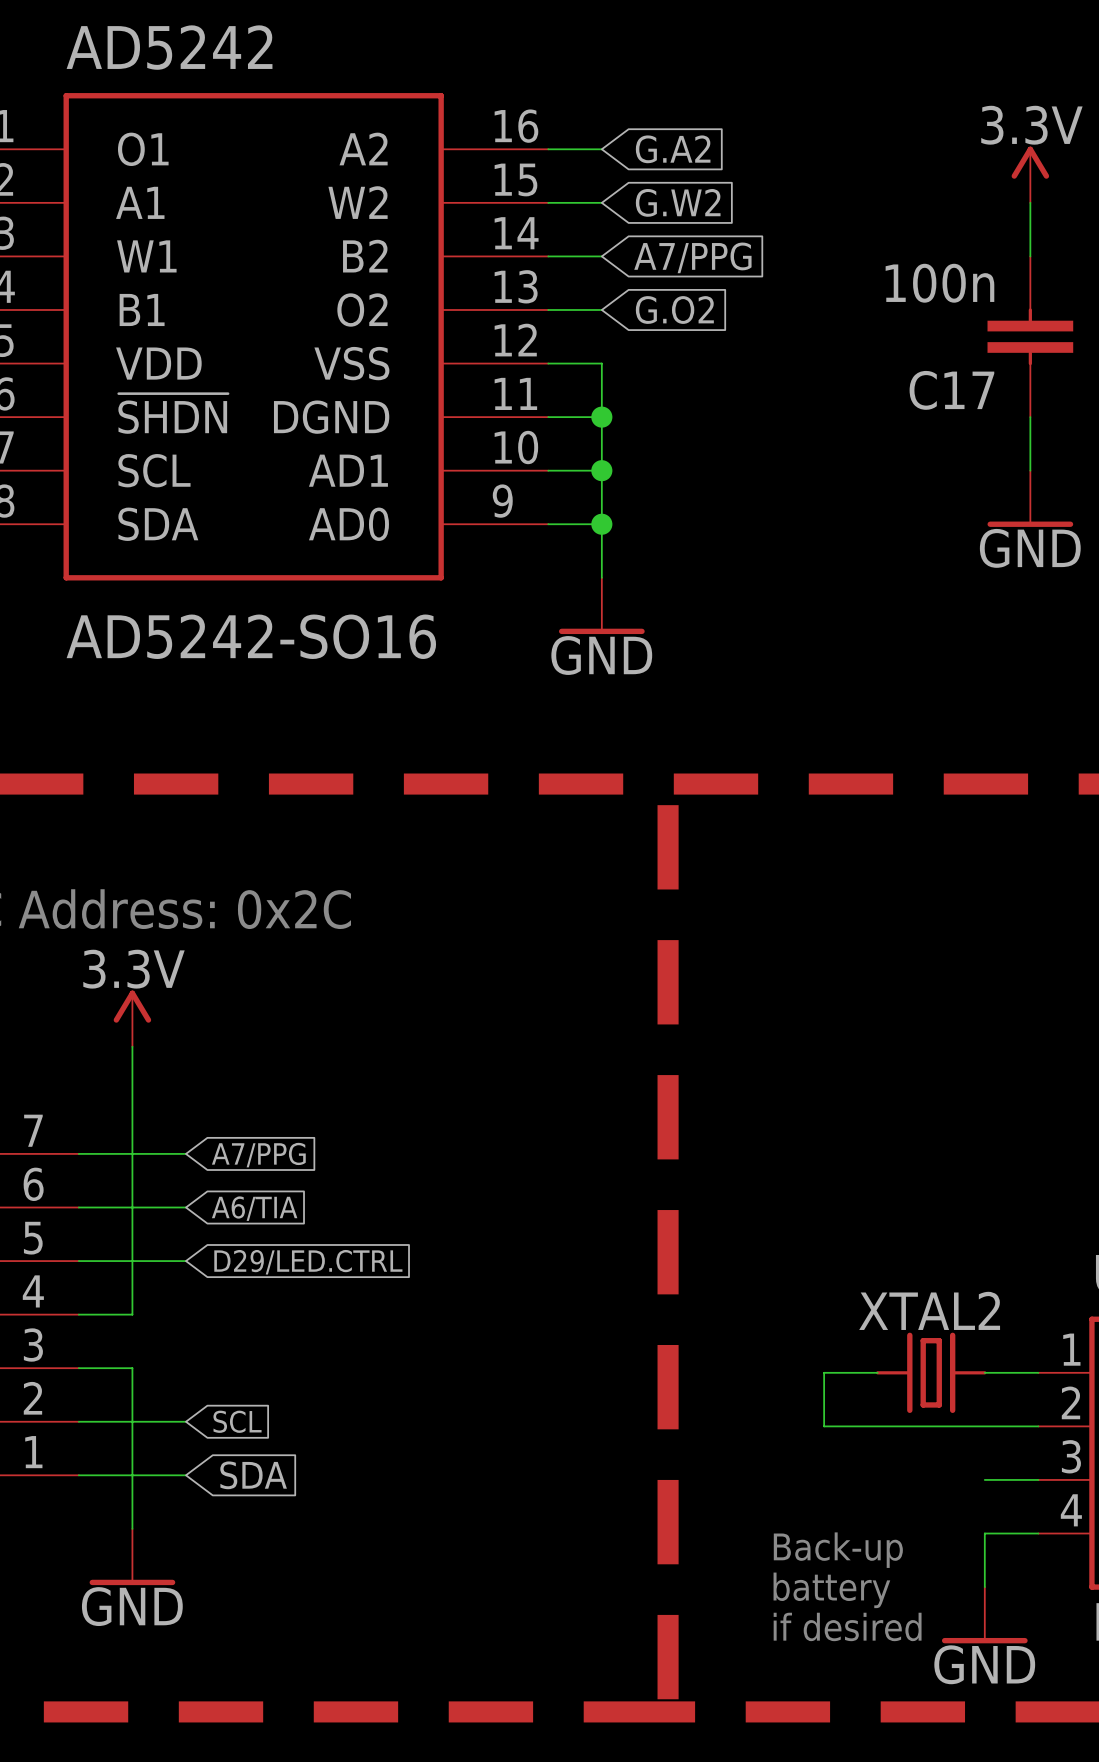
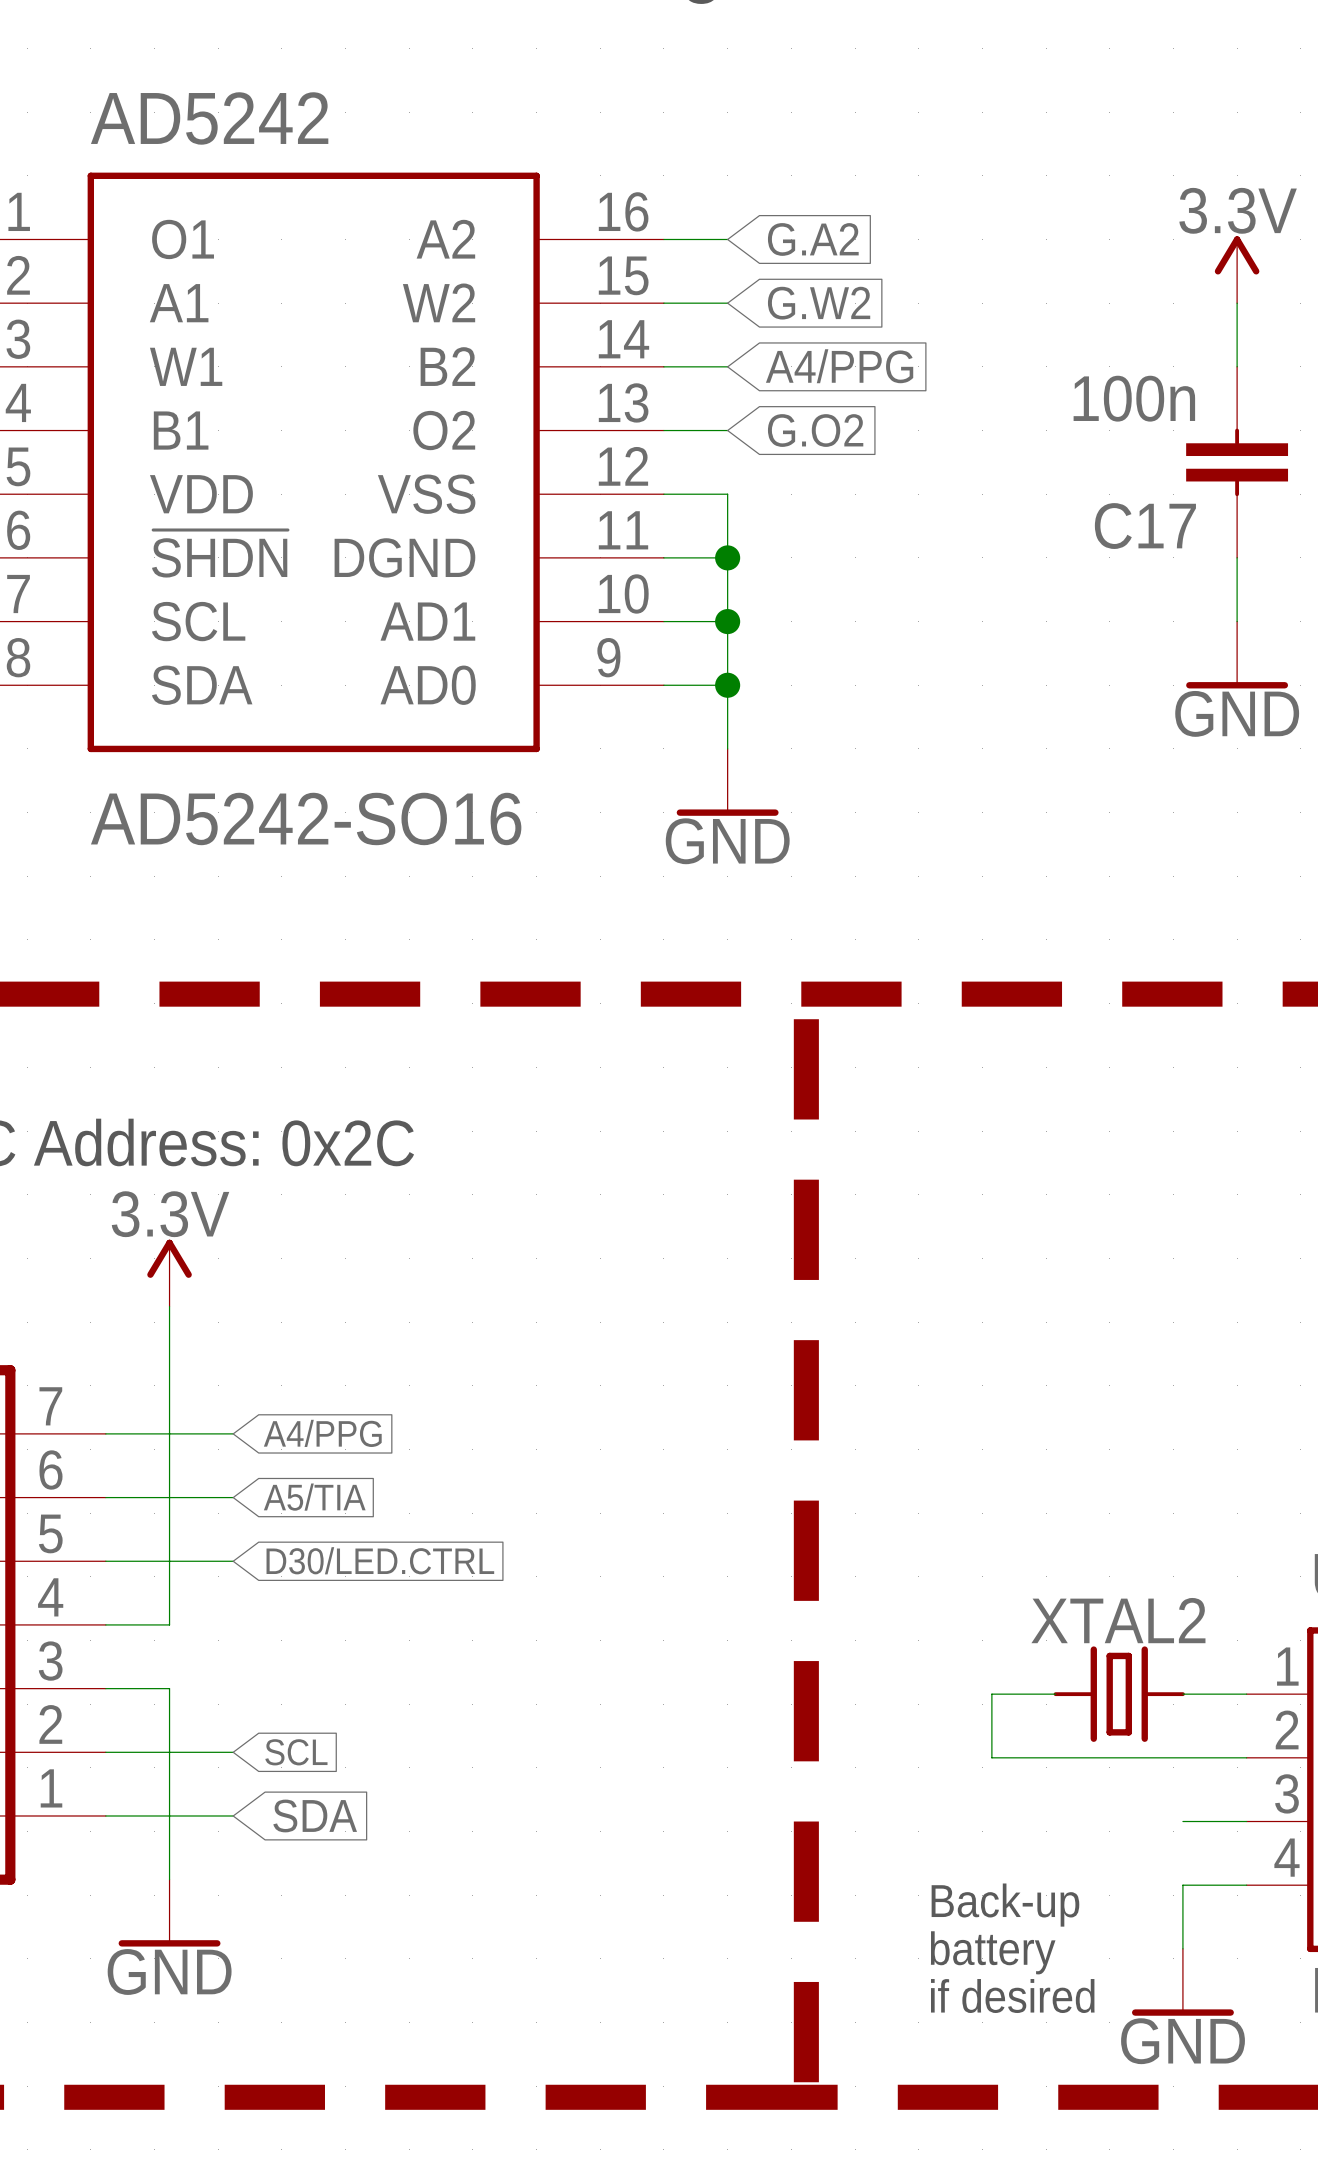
global label: A7/PPG (692, 257) -> A4/PPG (839, 366)
global label: A7/PPG (258, 1155) -> A4/PPG (322, 1433)
global label: A6/TIA (254, 1208) -> A5/TIA (314, 1497)
global label: D29/LED.CTRL (308, 1262) -> D30/LED.CTRL (380, 1560)

